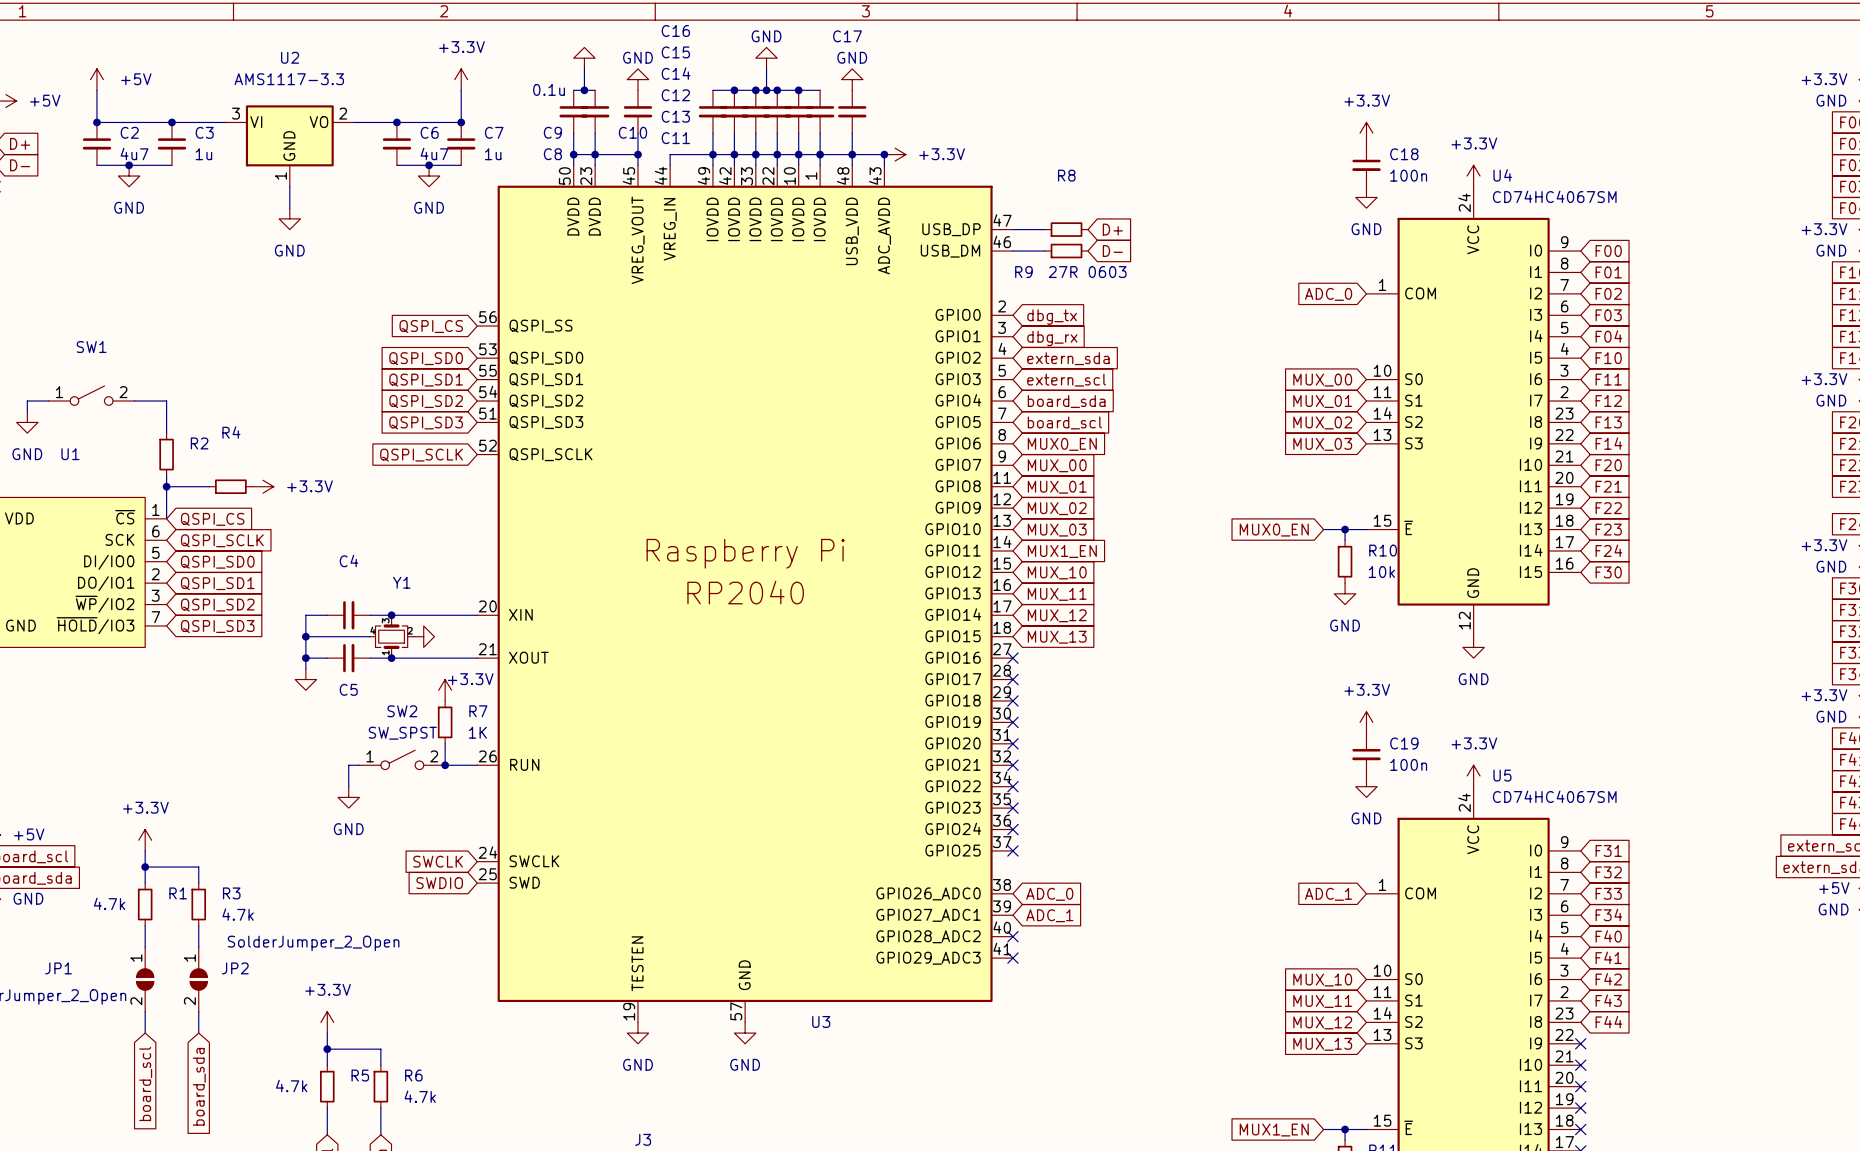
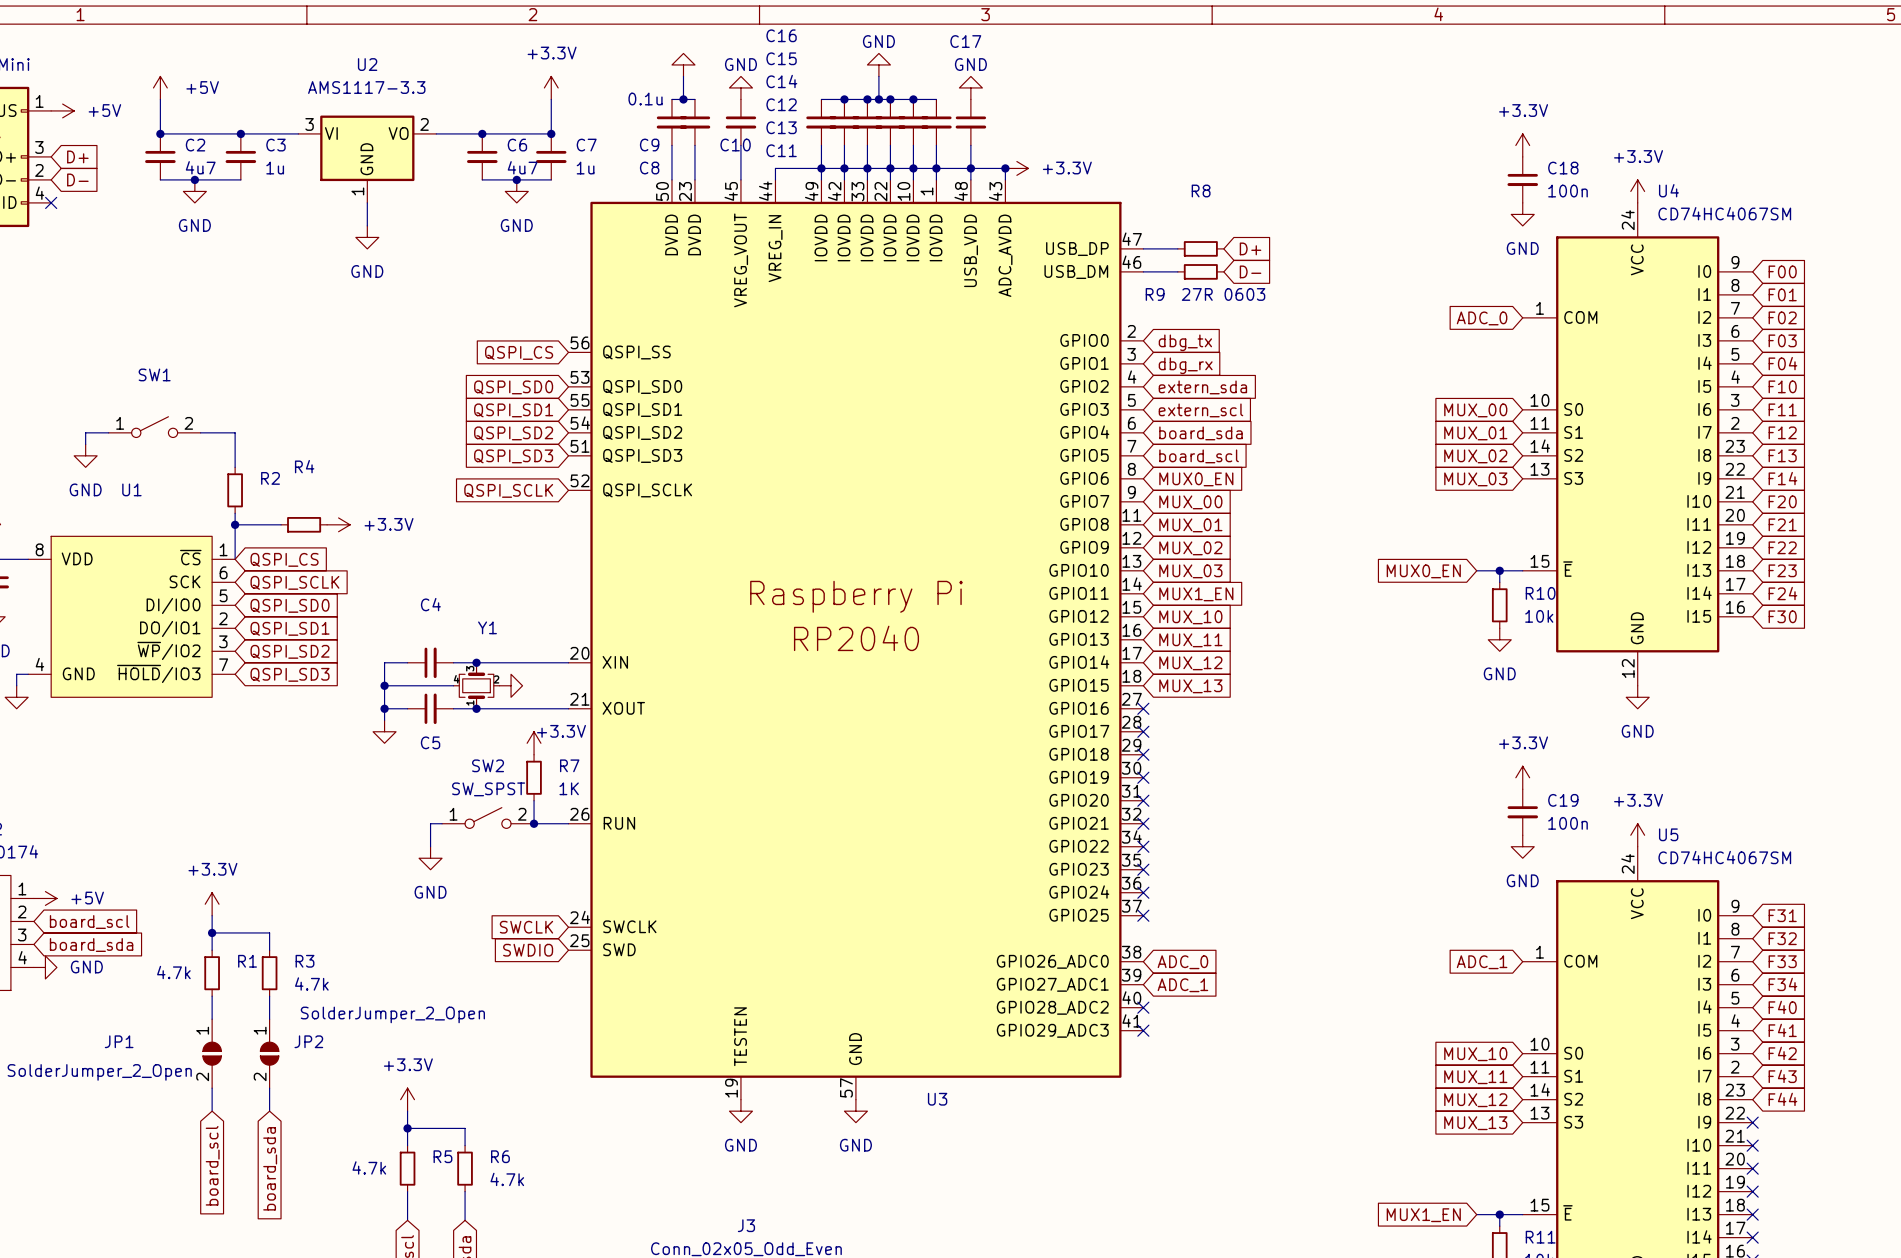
wire: (573, 154) (637, 154) -> none
junction: (573, 154) -> none
junction: (595, 154) -> none
junction: (637, 154) -> none

